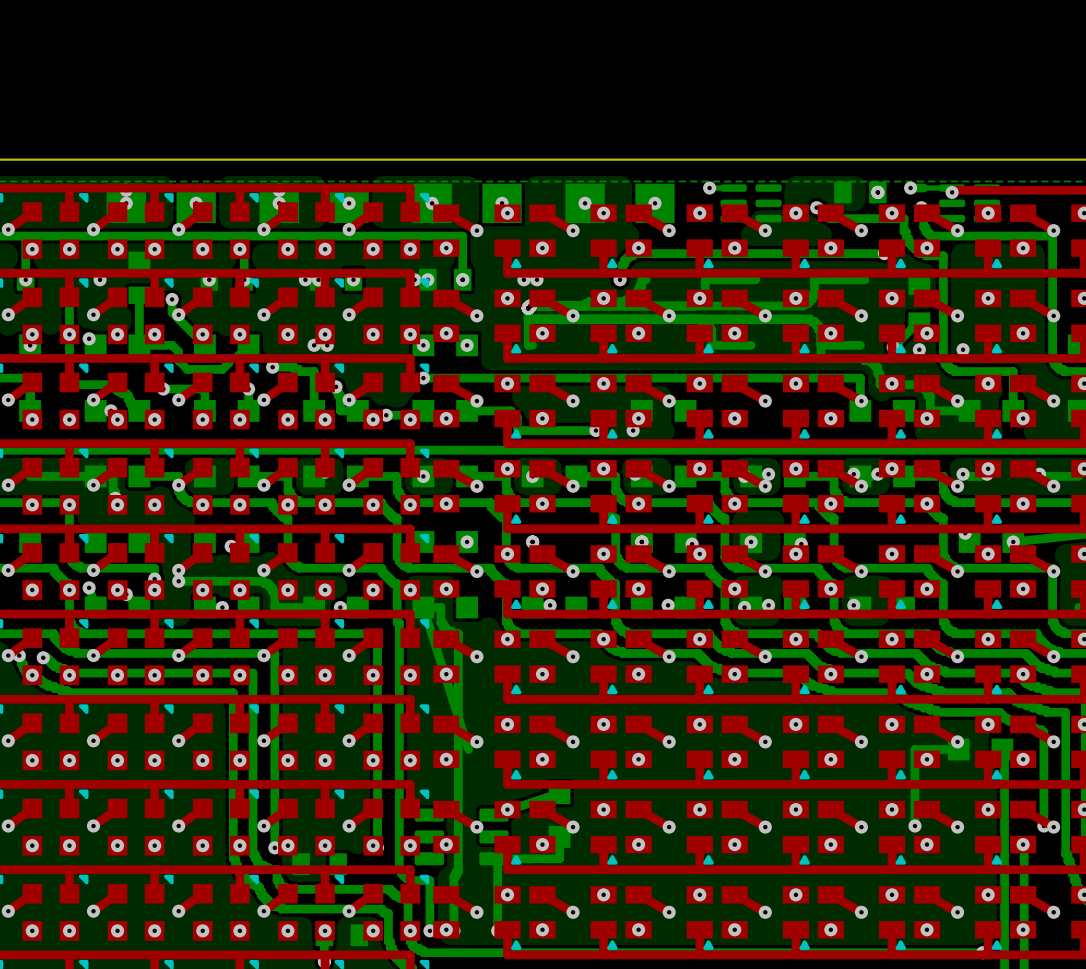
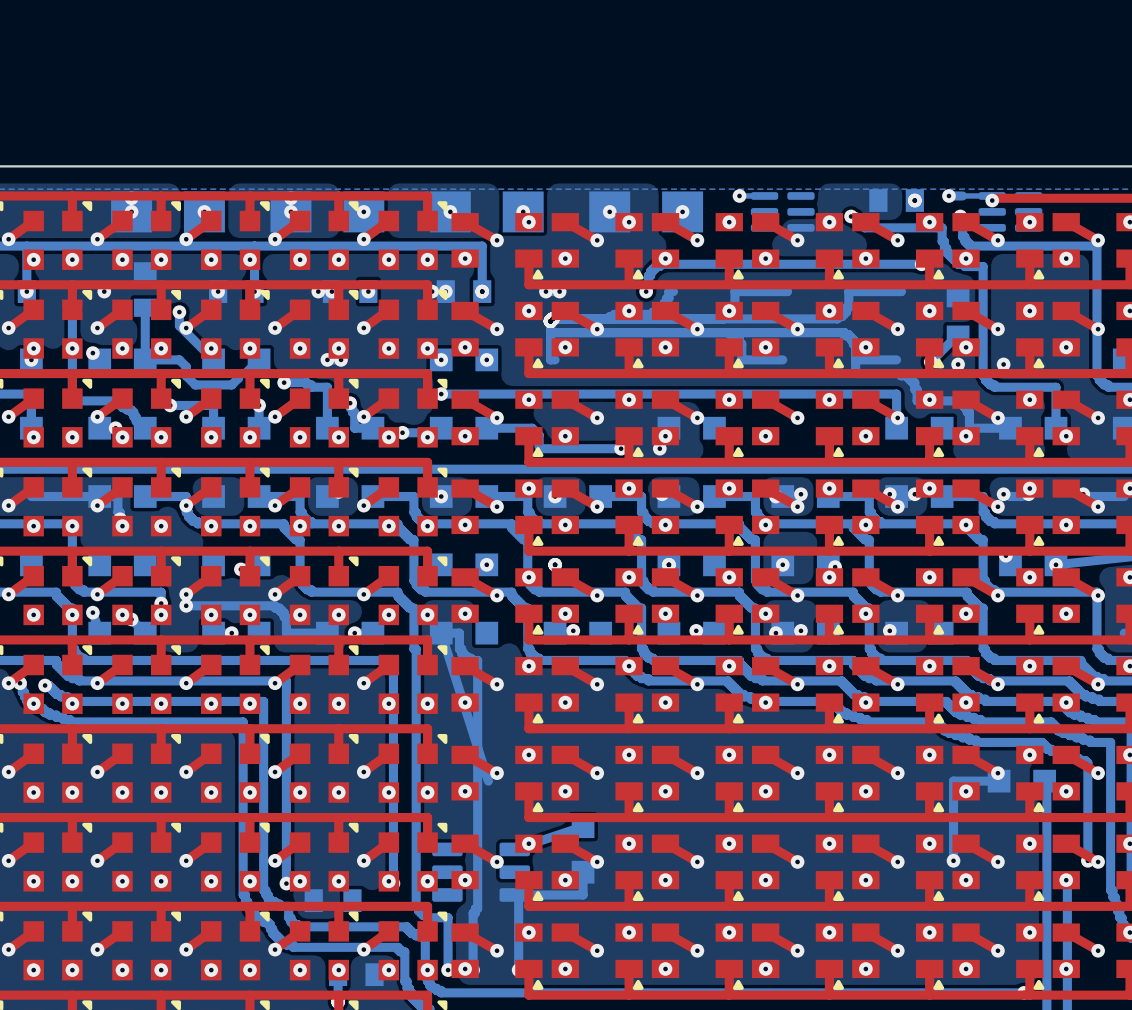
via: (692, 544) -> none

